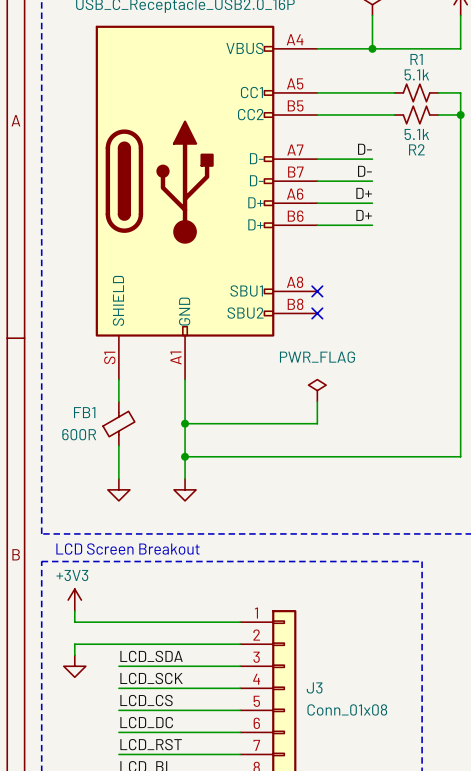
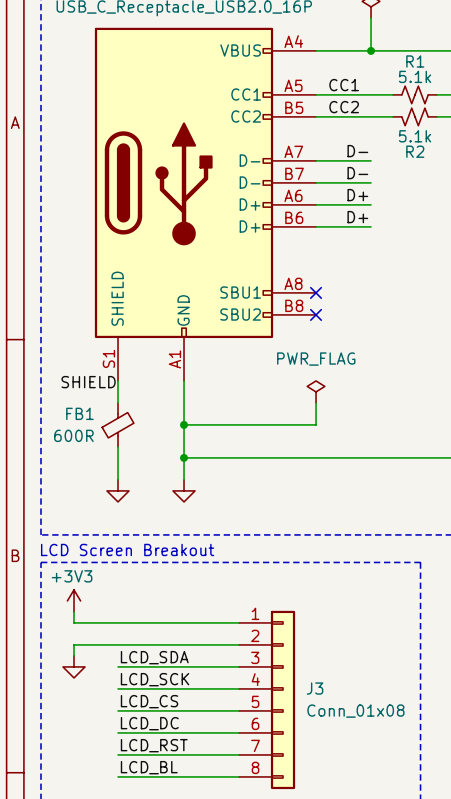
label: none -> CC1 (344, 85)
label: none -> CC2 (344, 107)
label: none -> SHIELD (88, 382)

